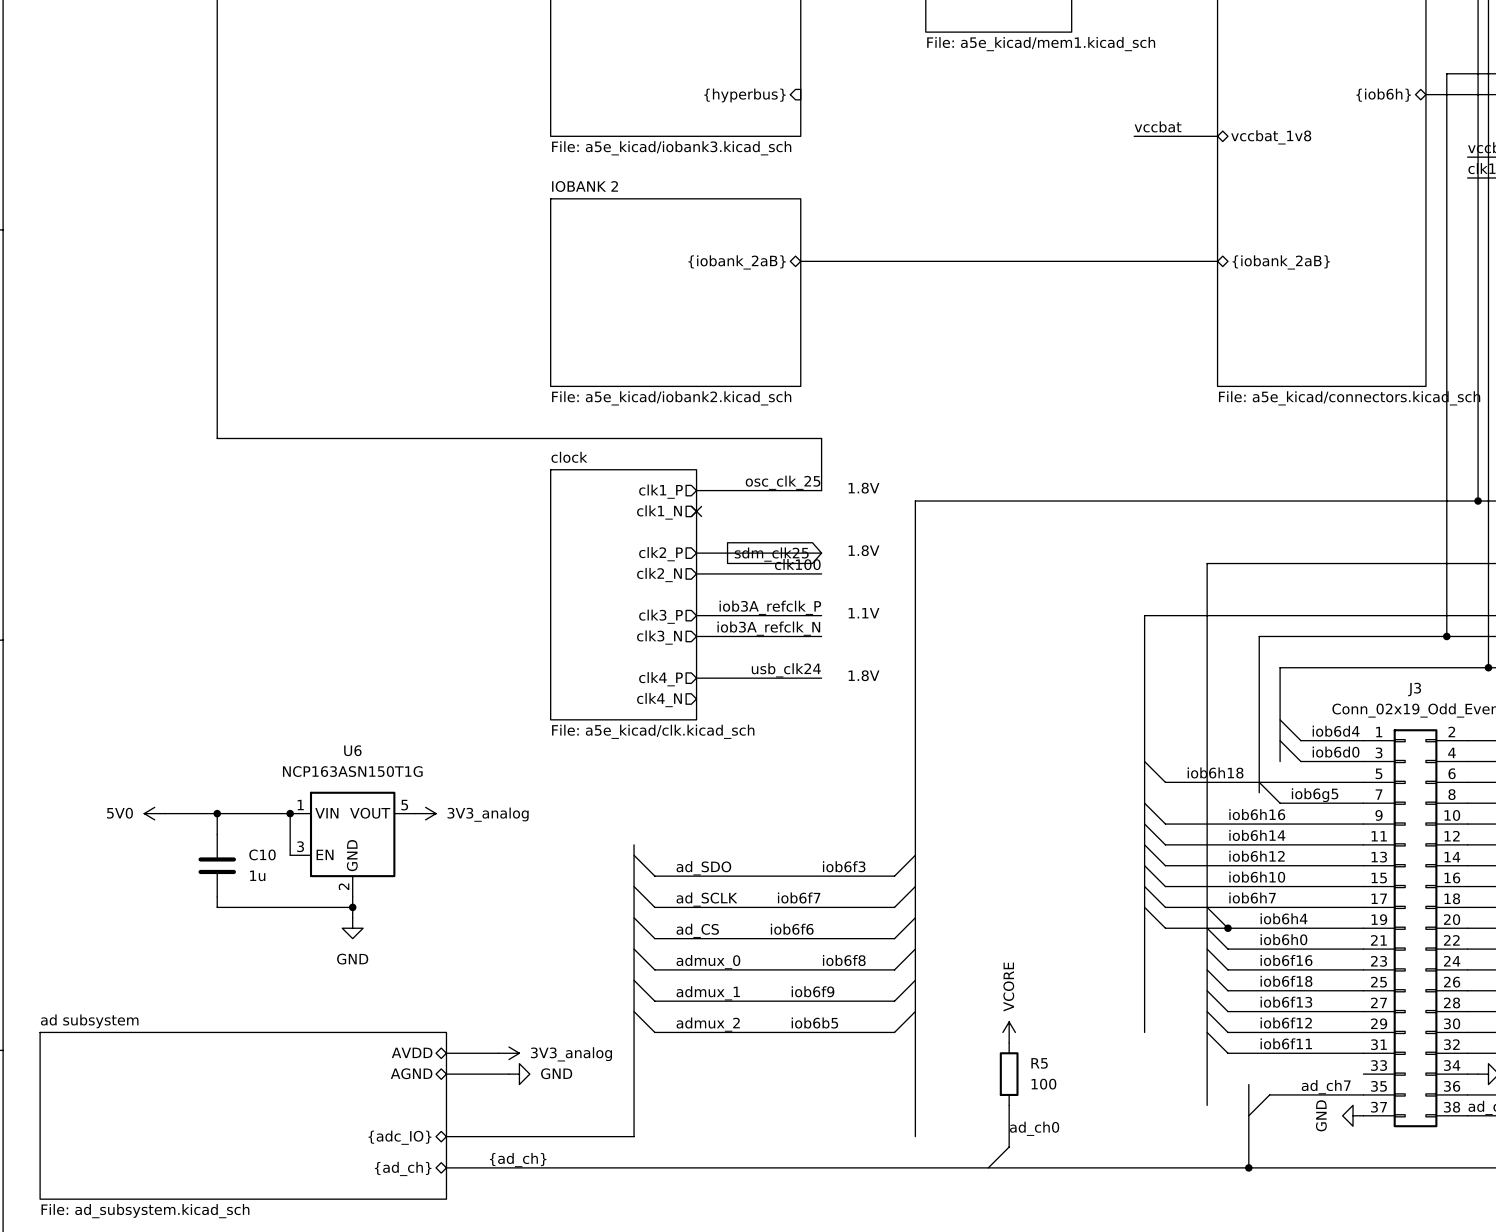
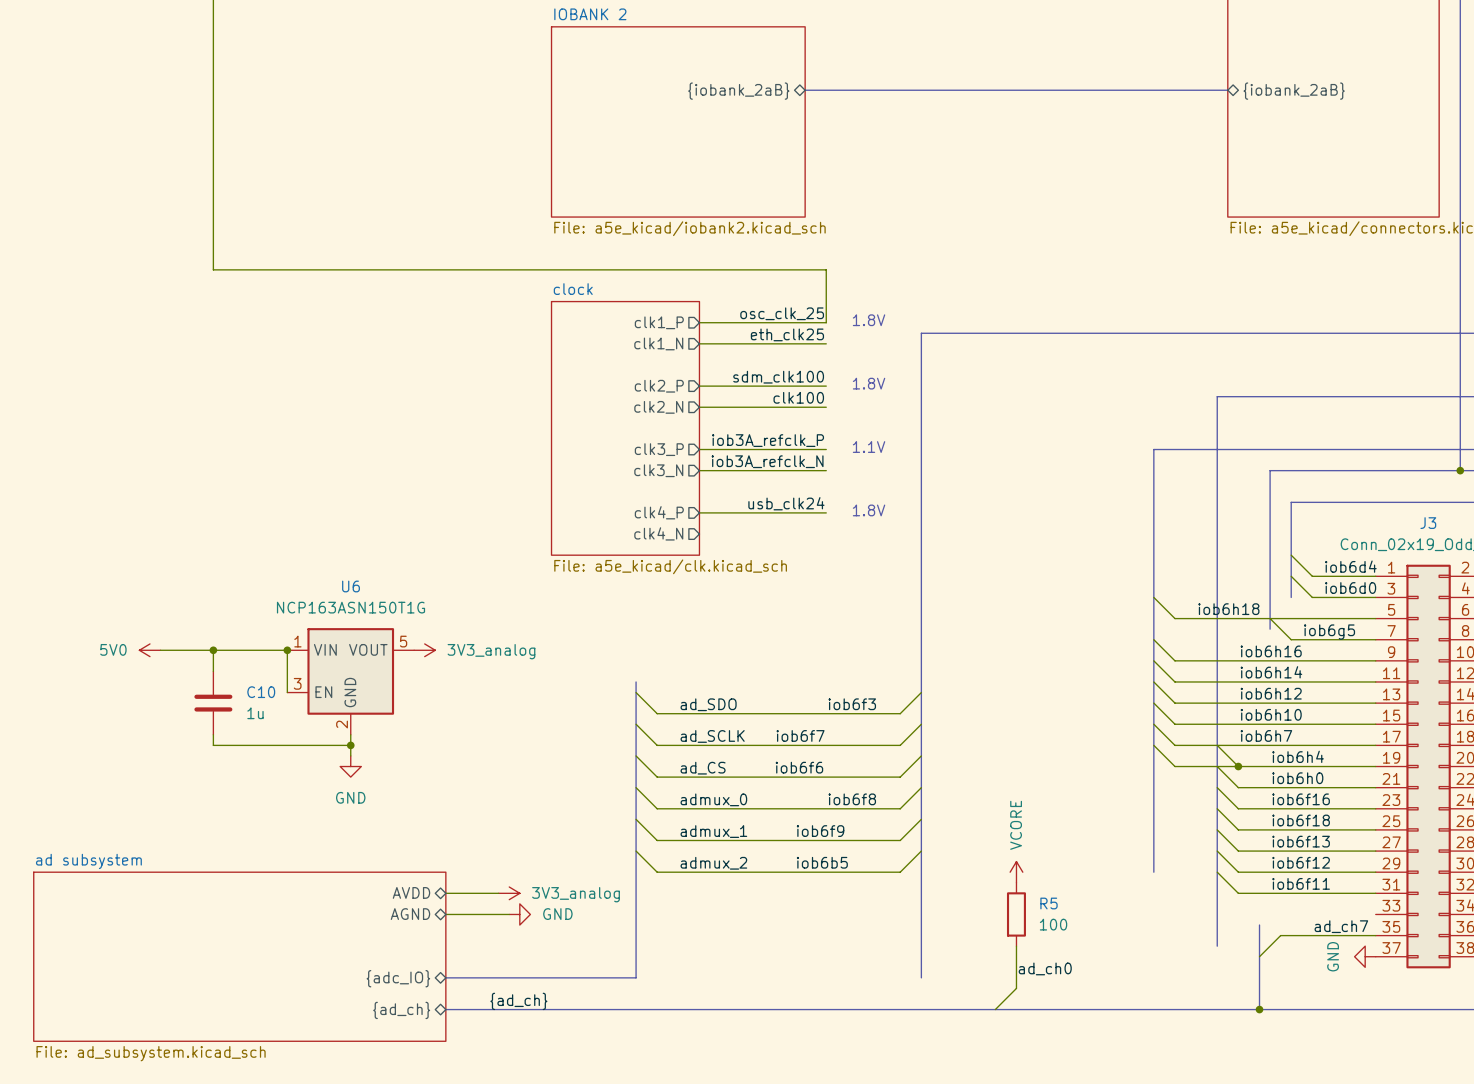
label: none -> eth_clk25 (787, 334)
wire: none -> (699, 343) (826, 343)
no-connect mark: (696, 511) -> none
label: none -> sdm_clk100 (778, 377)
global label: sdm_clk25 (771, 554) -> none

